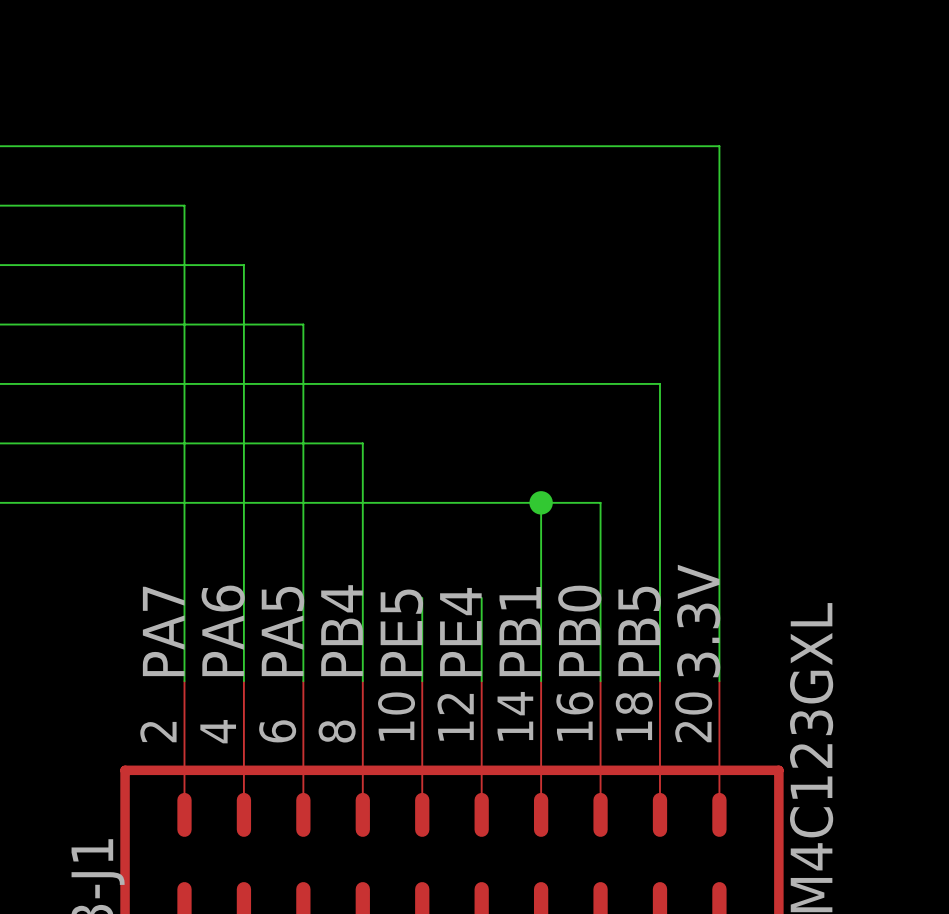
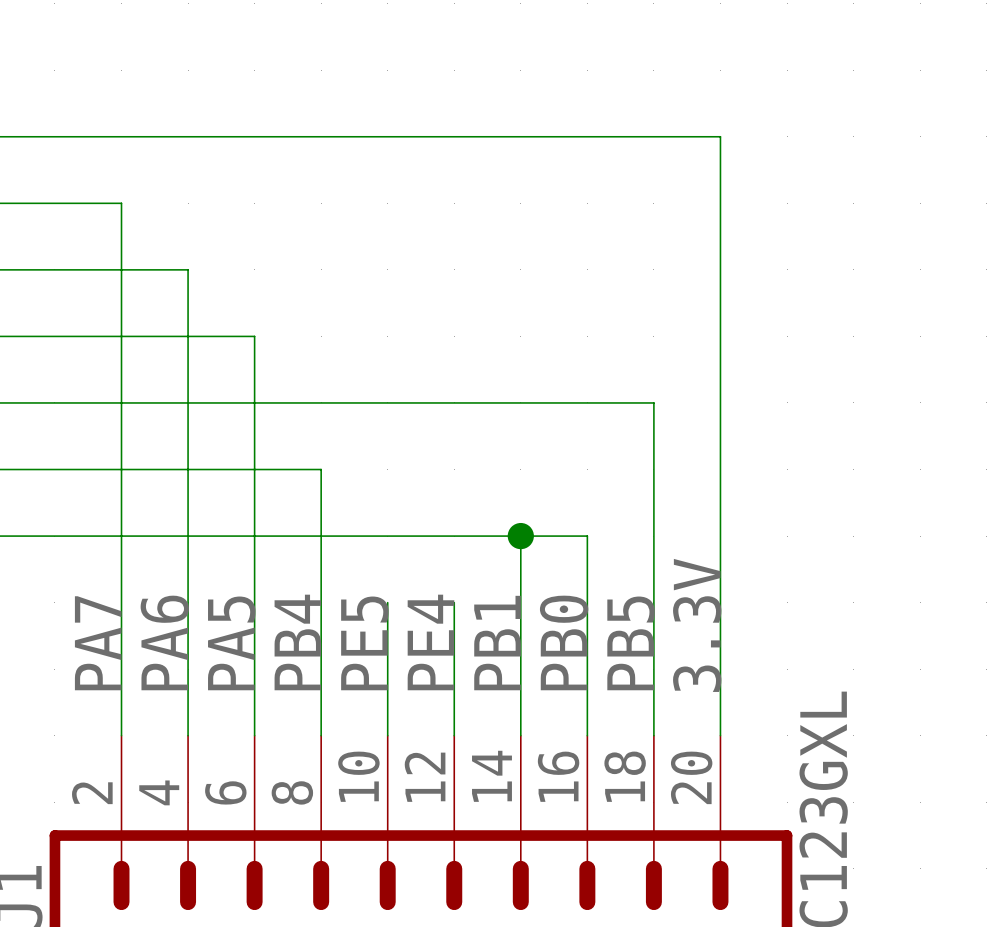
wire: none -> (387, 602) (387, 642)
wire: none -> (454, 602) (454, 642)
label position: 3.3V (698, 621) -> 3.3V (697, 625)
label position: PA6 (223, 630) -> PA6 (164, 642)
label position: PB4 (342, 630) -> PB4 (297, 642)
text position: PB0 (579, 630) -> PB0 (564, 642)
label position: PA7 (163, 631) -> PA7 (98, 643)
label position: PA5 (282, 631) -> PA5 (231, 643)
text position: PB1 (520, 631) -> PB1 (497, 643)
label position: PB5 (639, 631) -> PB5 (631, 643)
label position: PE5 (401, 632) -> PE5 (364, 643)
label position: PE4 (460, 632) -> PE4 (430, 642)

